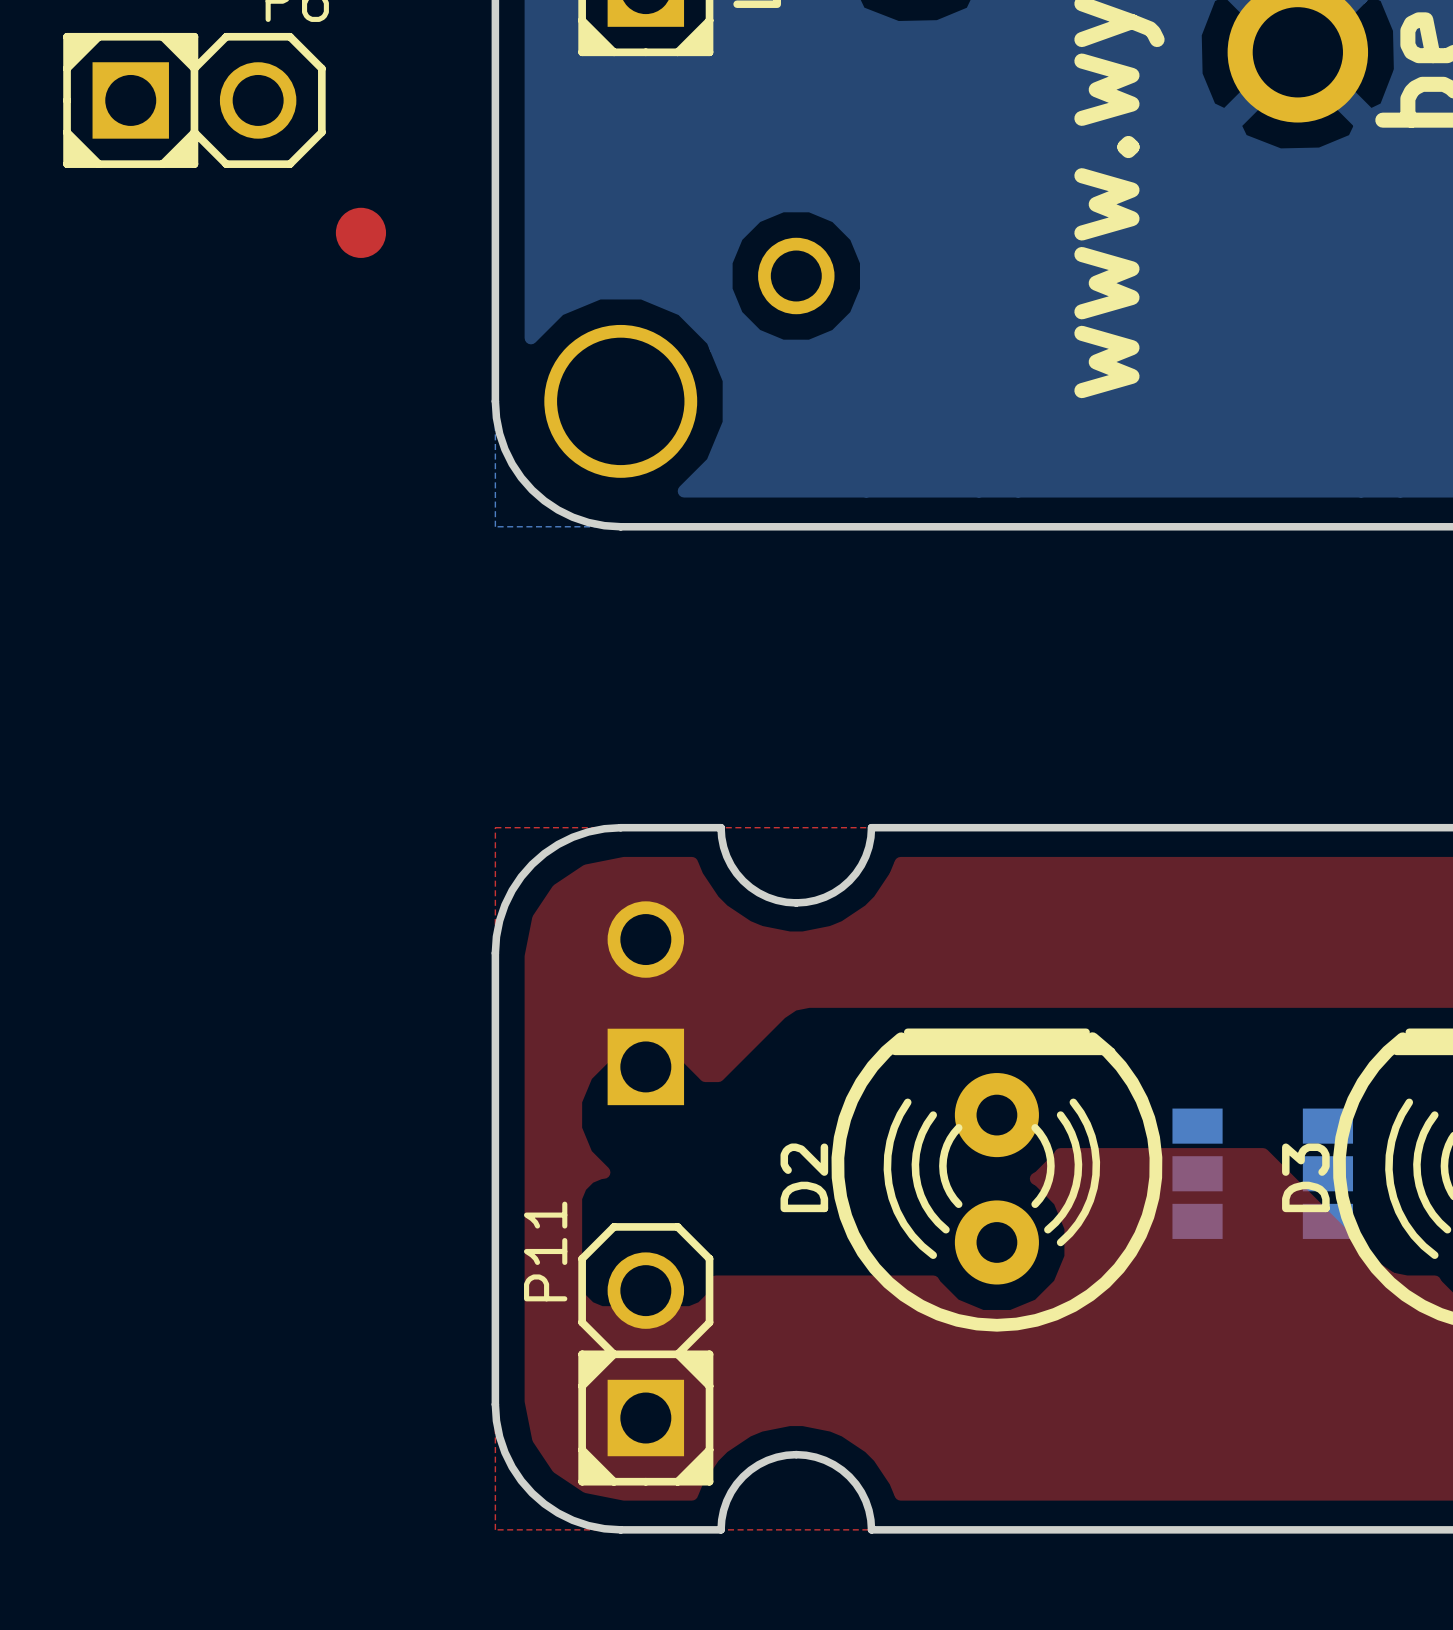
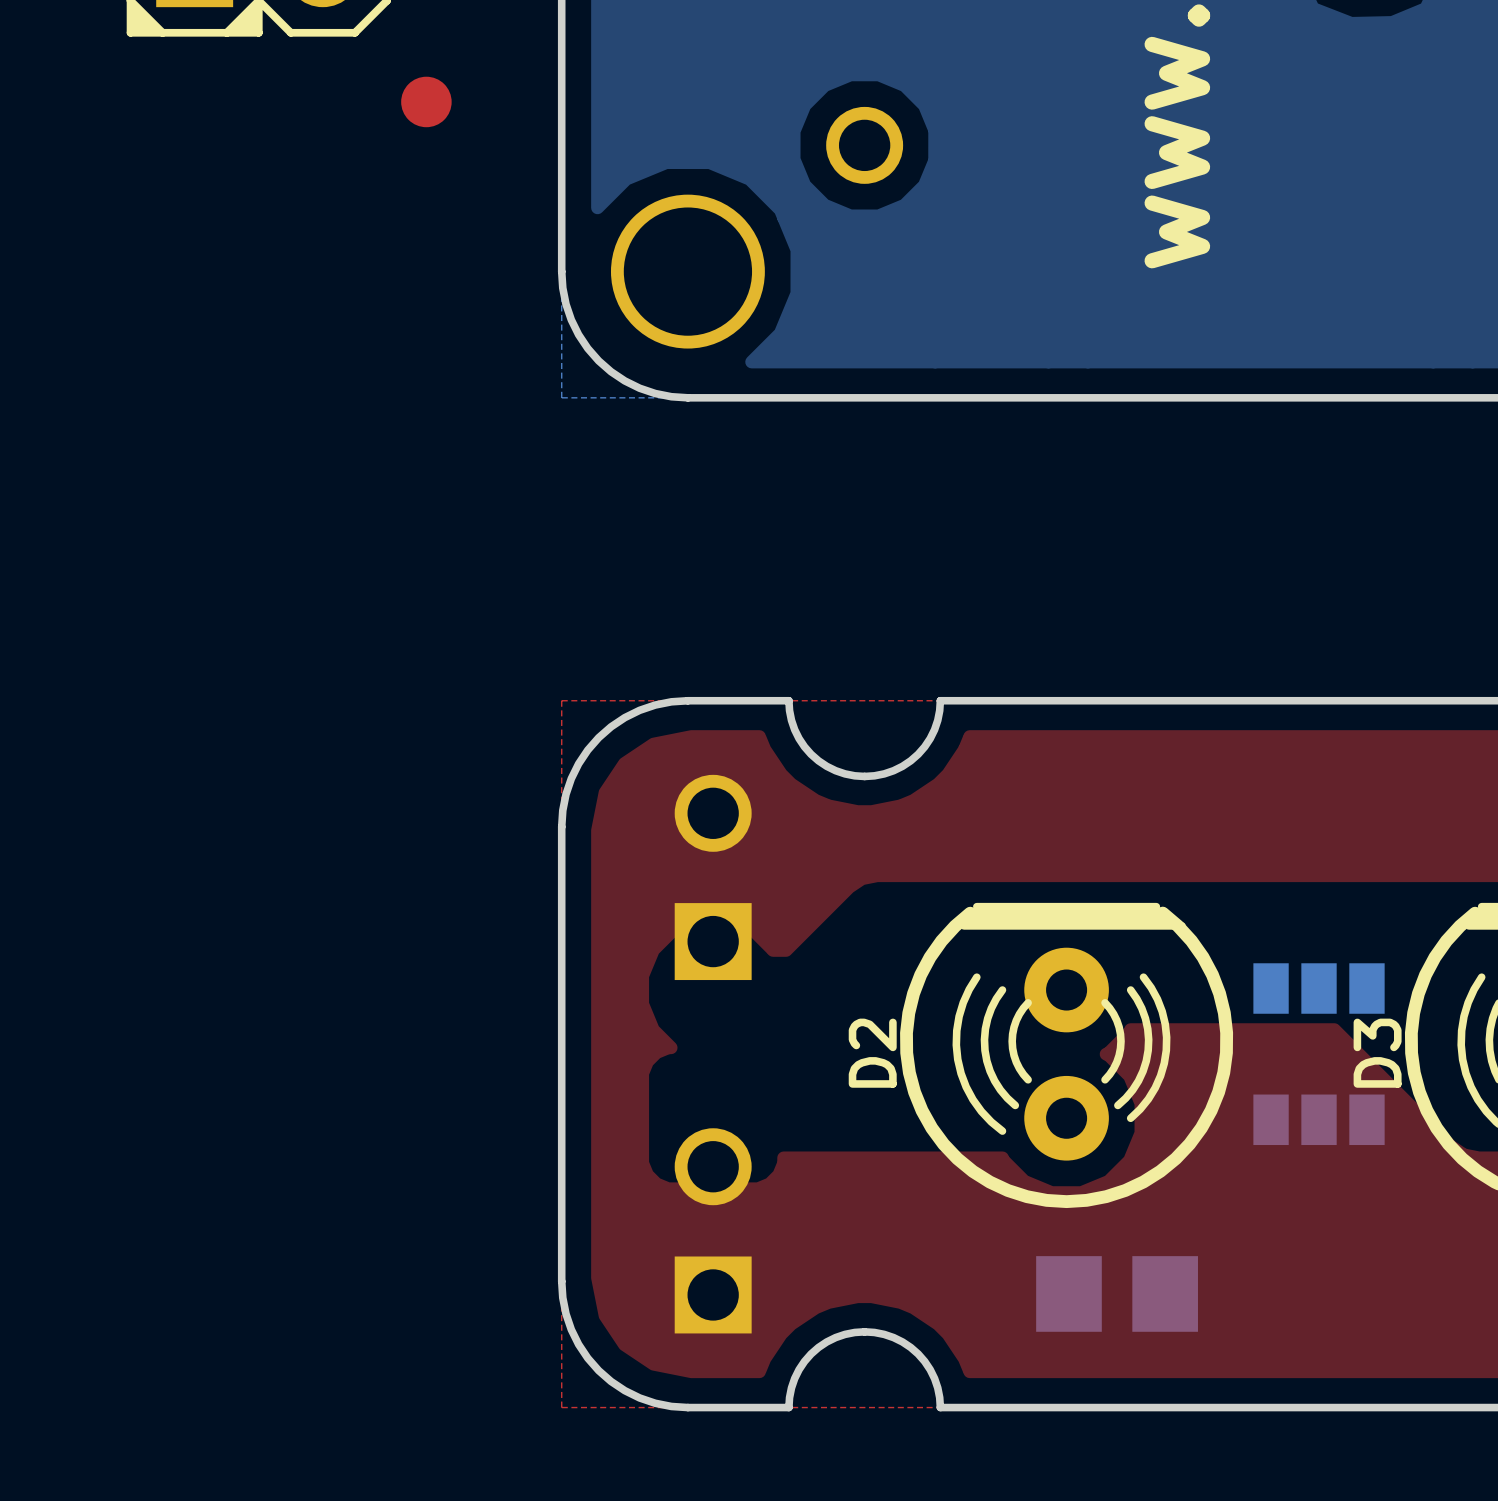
part rotation: 0° (1262, 1173) -> 90° clockwise (1319, 1054)
P11 side: top (645, 1354) -> bottom (713, 1230)
part: none -> (1117, 1293)

